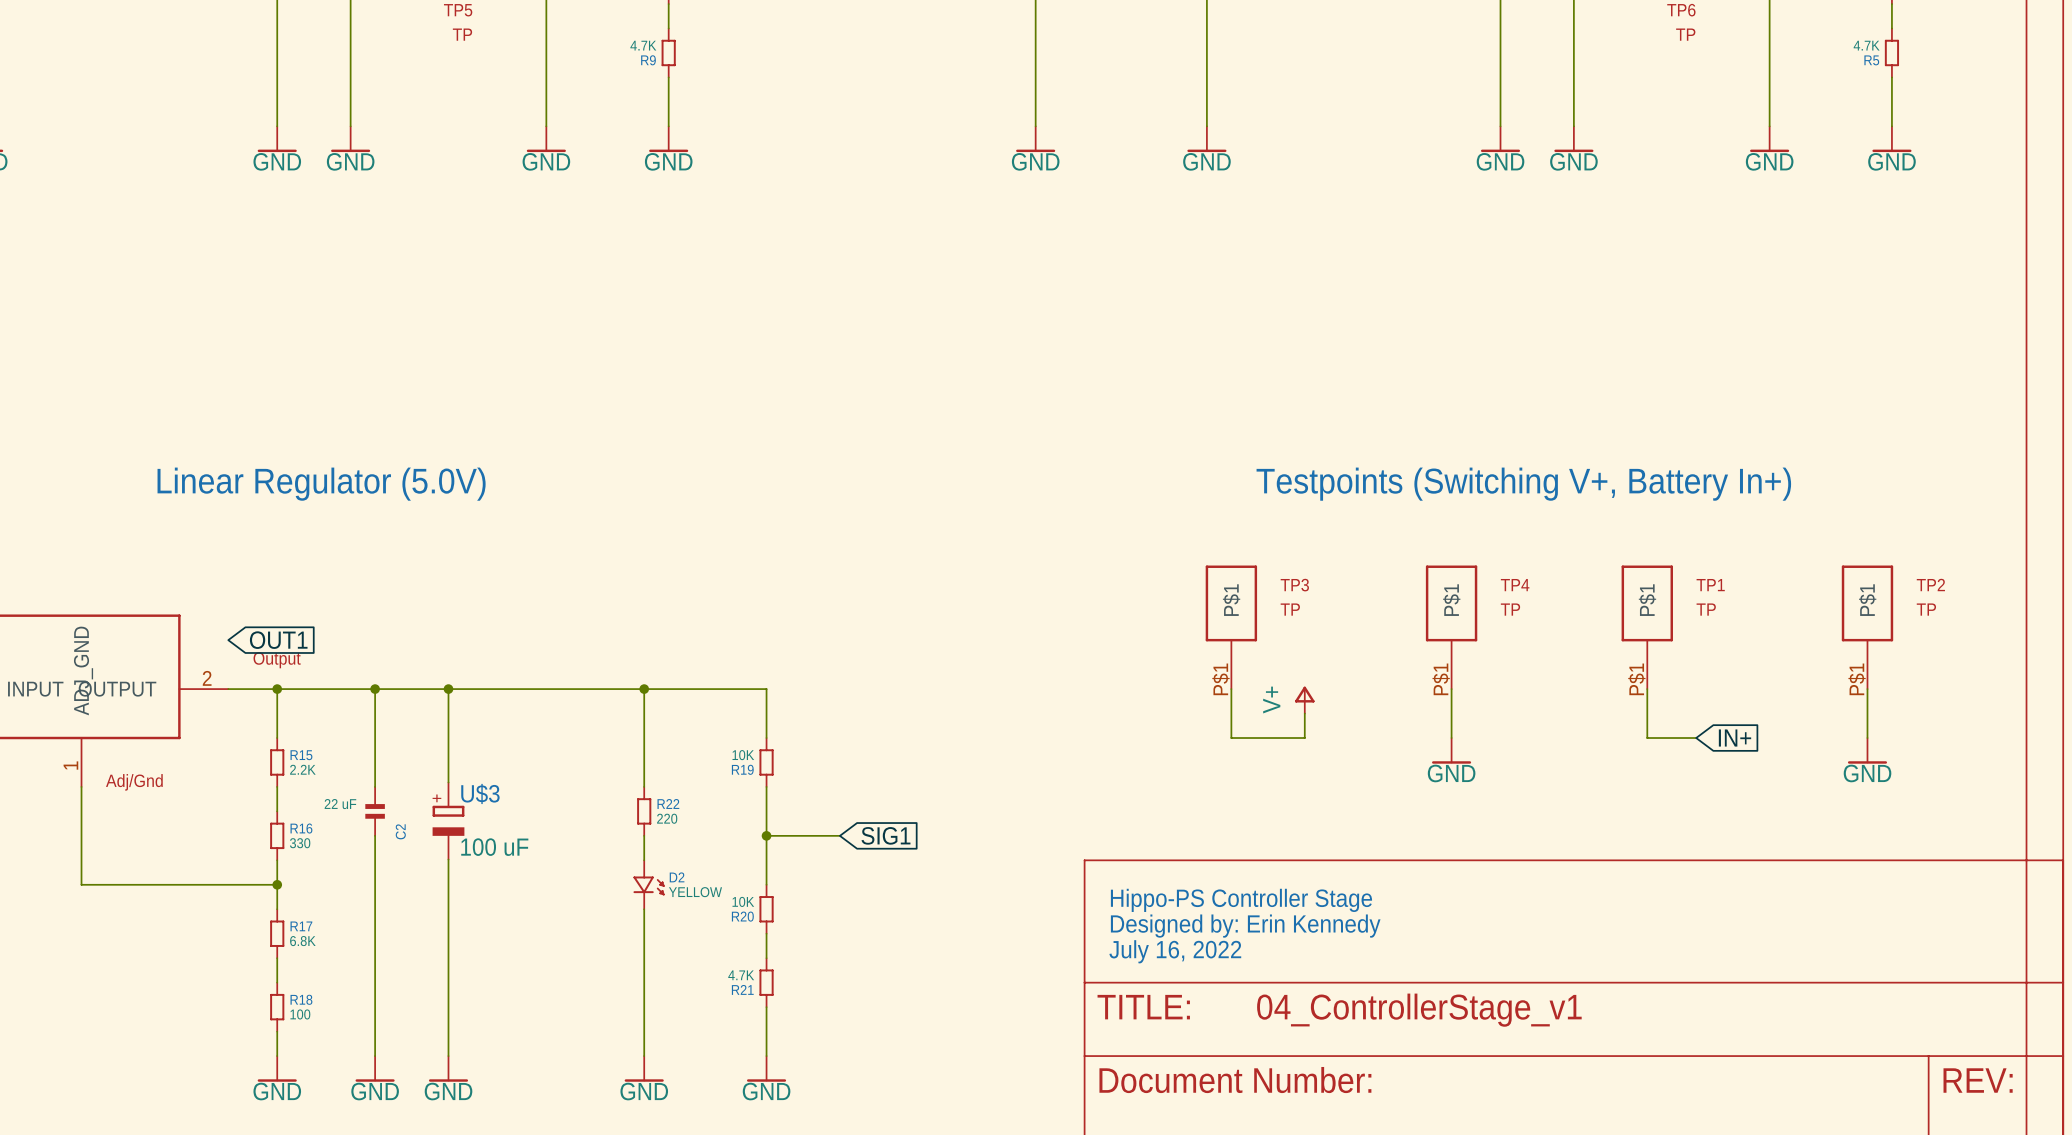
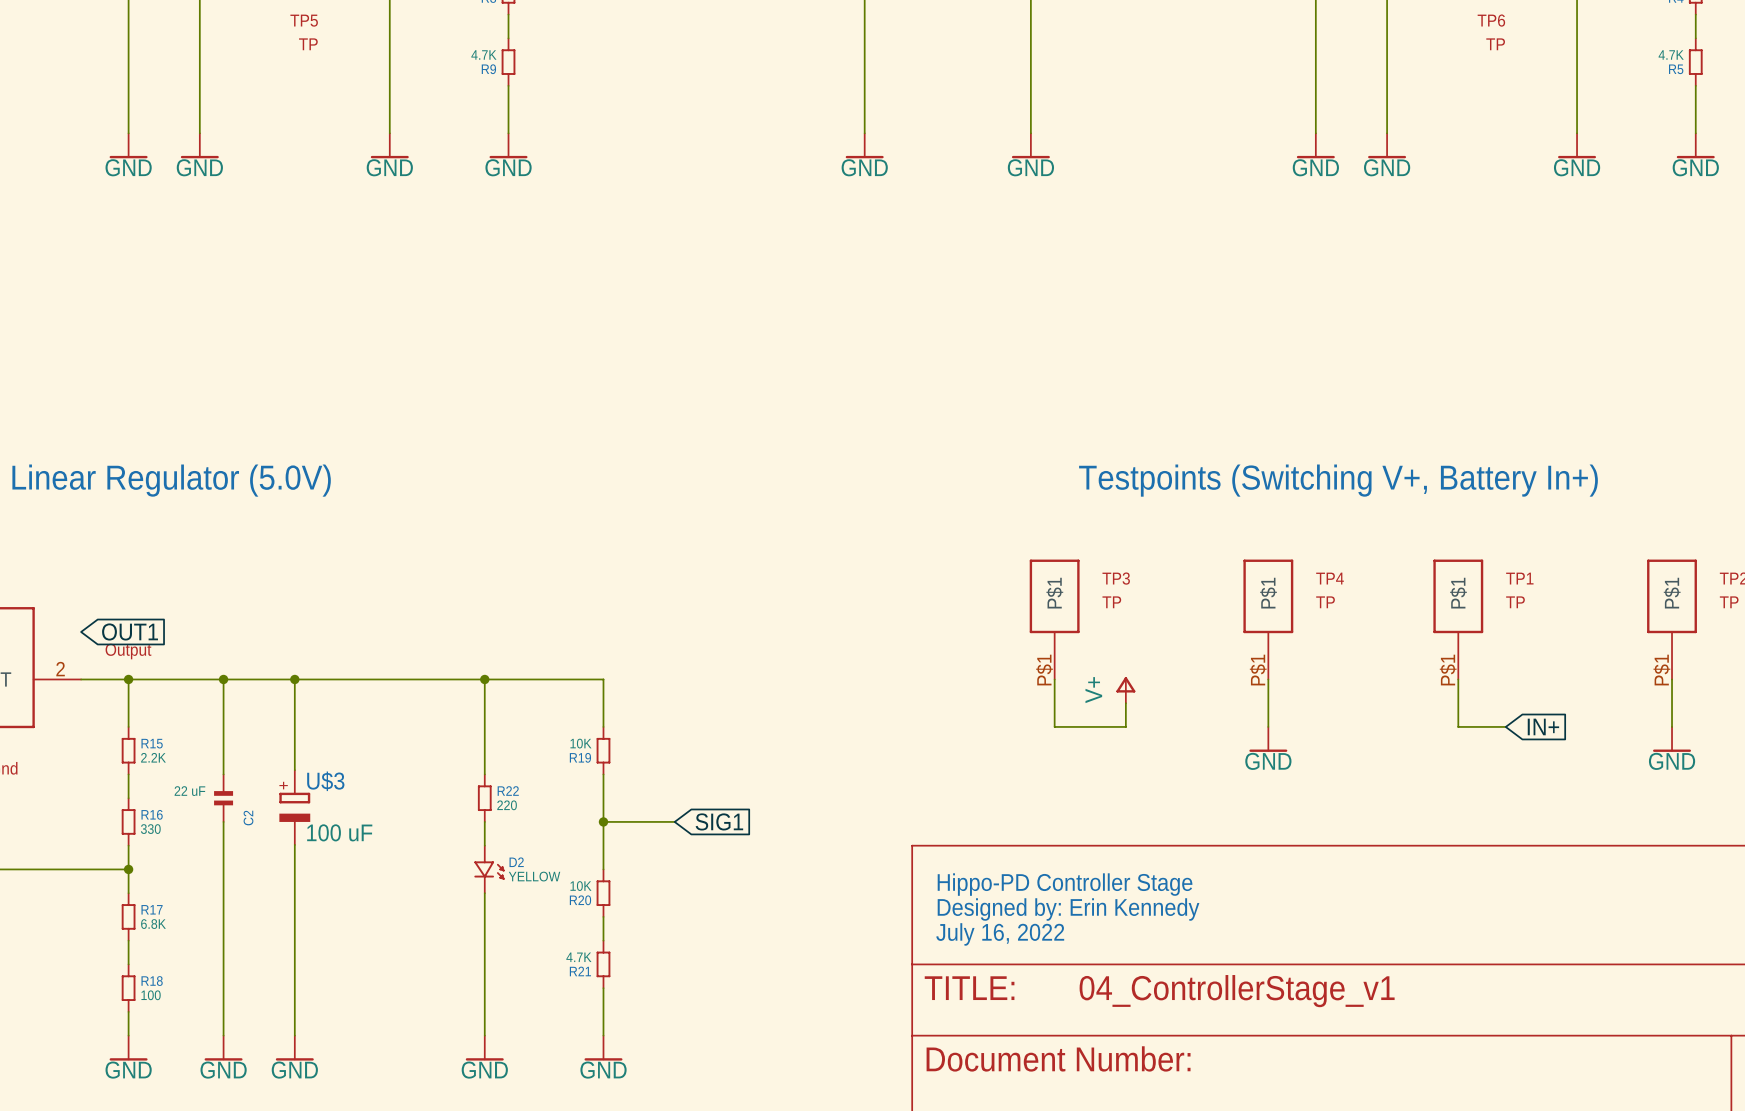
text: Hippo-PS Controller Stage (1241, 900) -> Hippo-PD Controller Stage (1065, 884)

